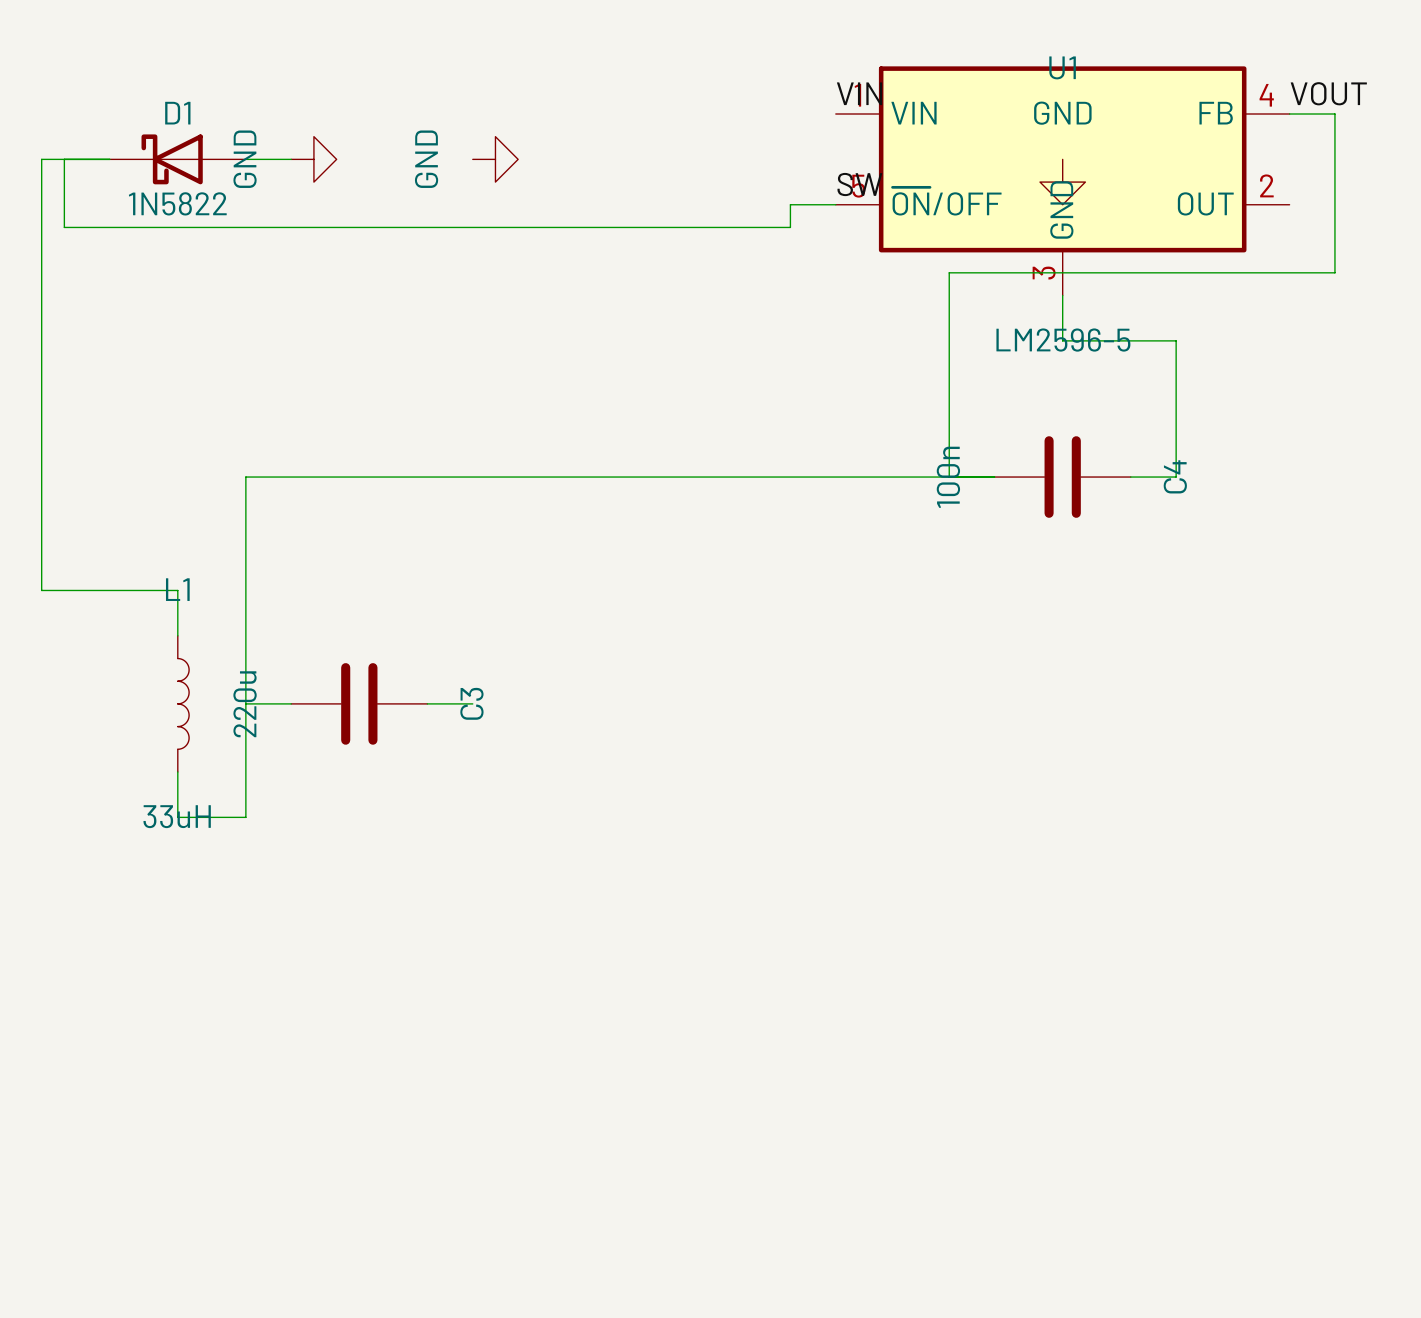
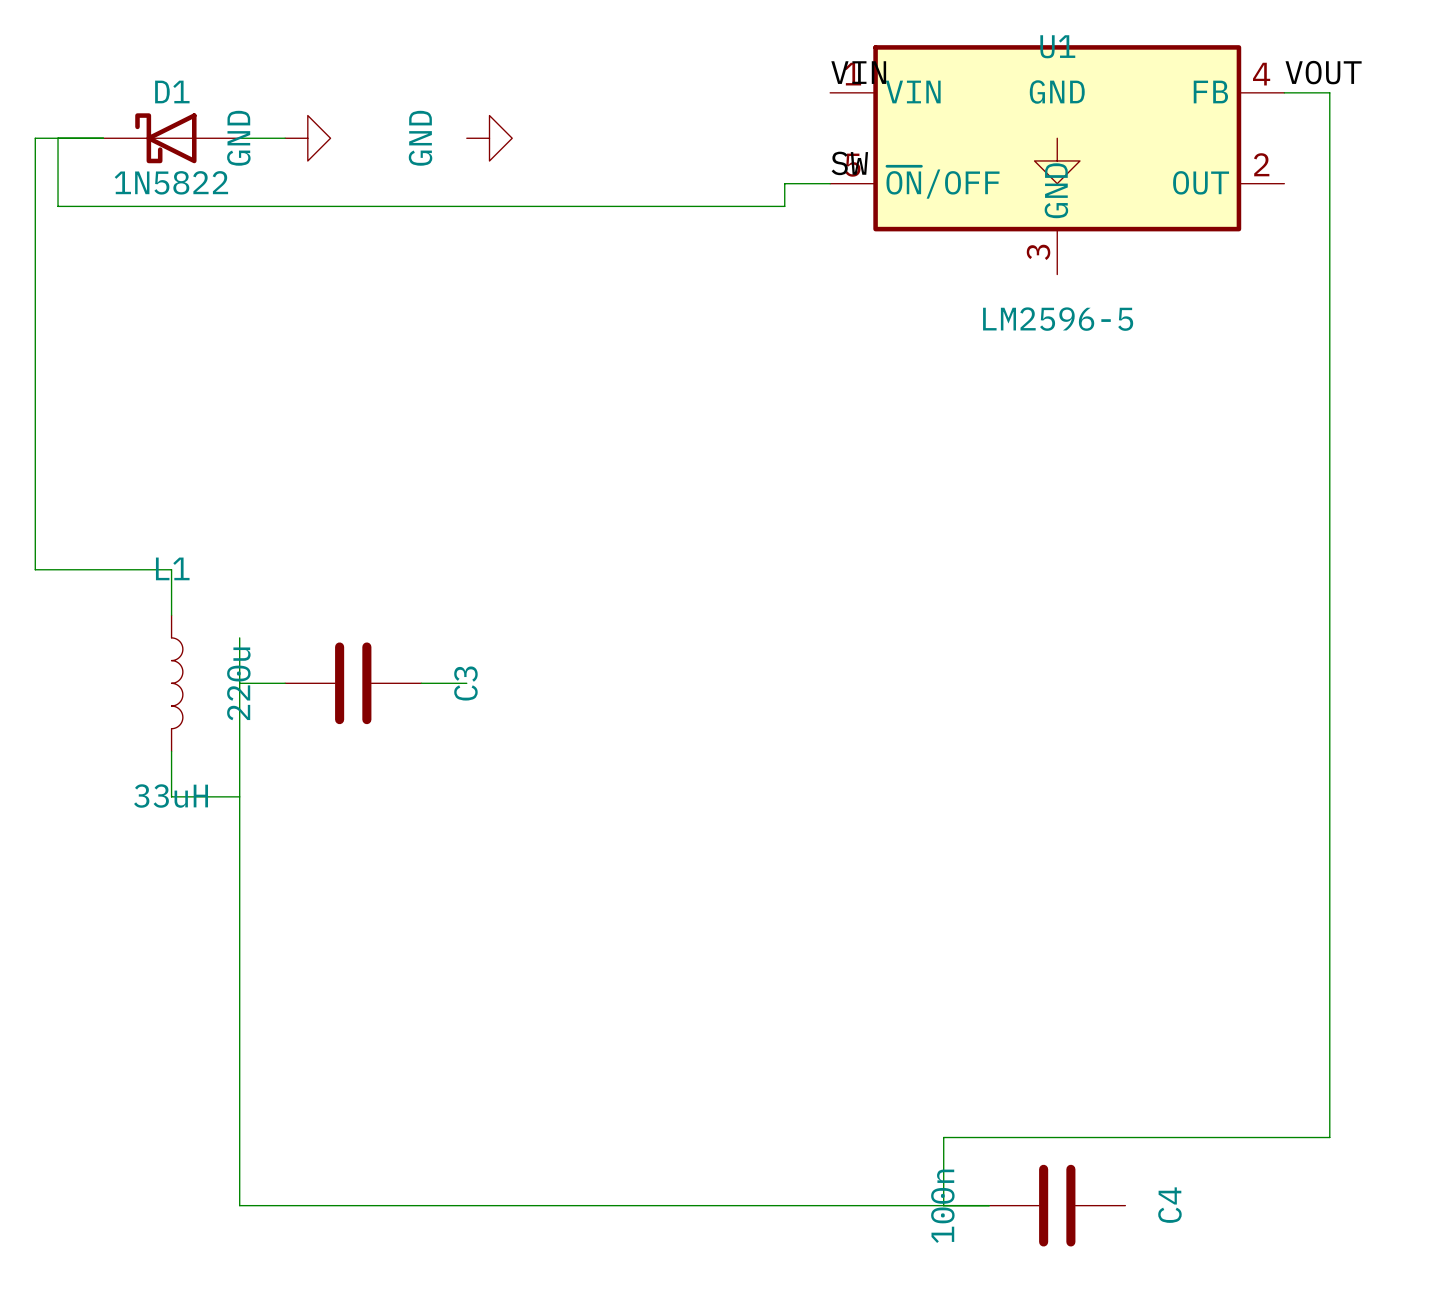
wire: (1334, 272) (949, 272) (949, 477) -> (1329, 251) (1329, 1137) (943, 1137) (943, 1205)
wire: (1062, 295) (1062, 340) (1176, 340) (1176, 477) (1130, 477) -> none
wire: (994, 477) (245, 477) (245, 658) -> none
C4 position: (1062, 477) -> (1057, 1205)
wire: none -> (239, 796) (239, 1205) (989, 1205)

